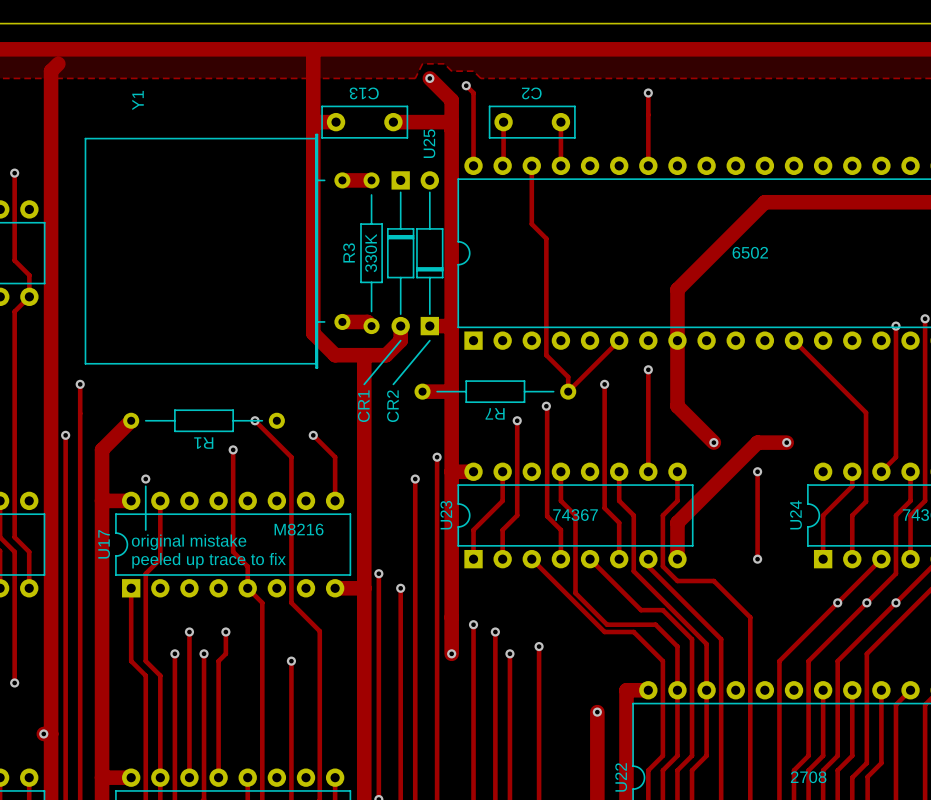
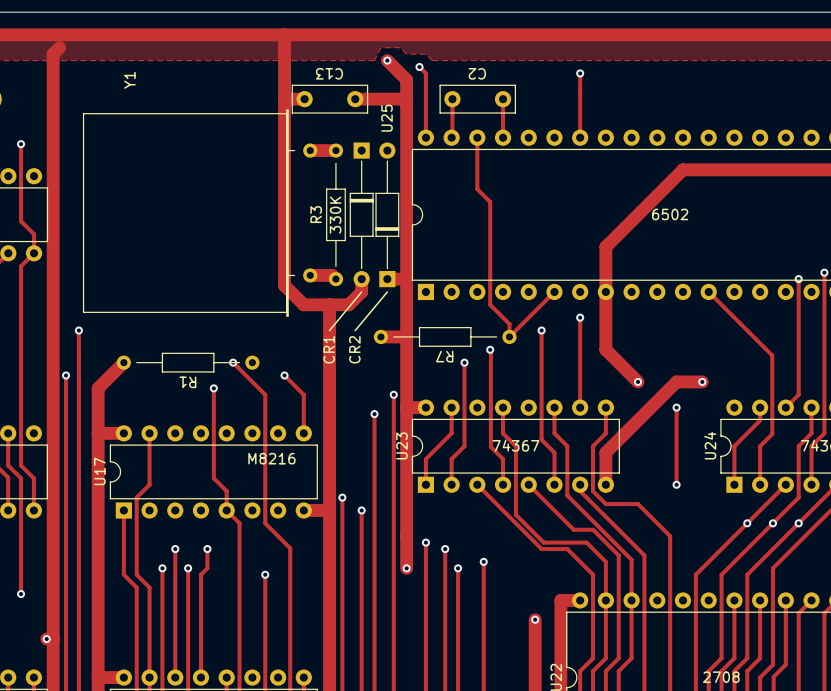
via: (145, 479) -> none
line: (145, 486) (145, 530) -> none
text: original mistake (189, 542) -> none
text: peeled up trace to fix (209, 560) -> none

